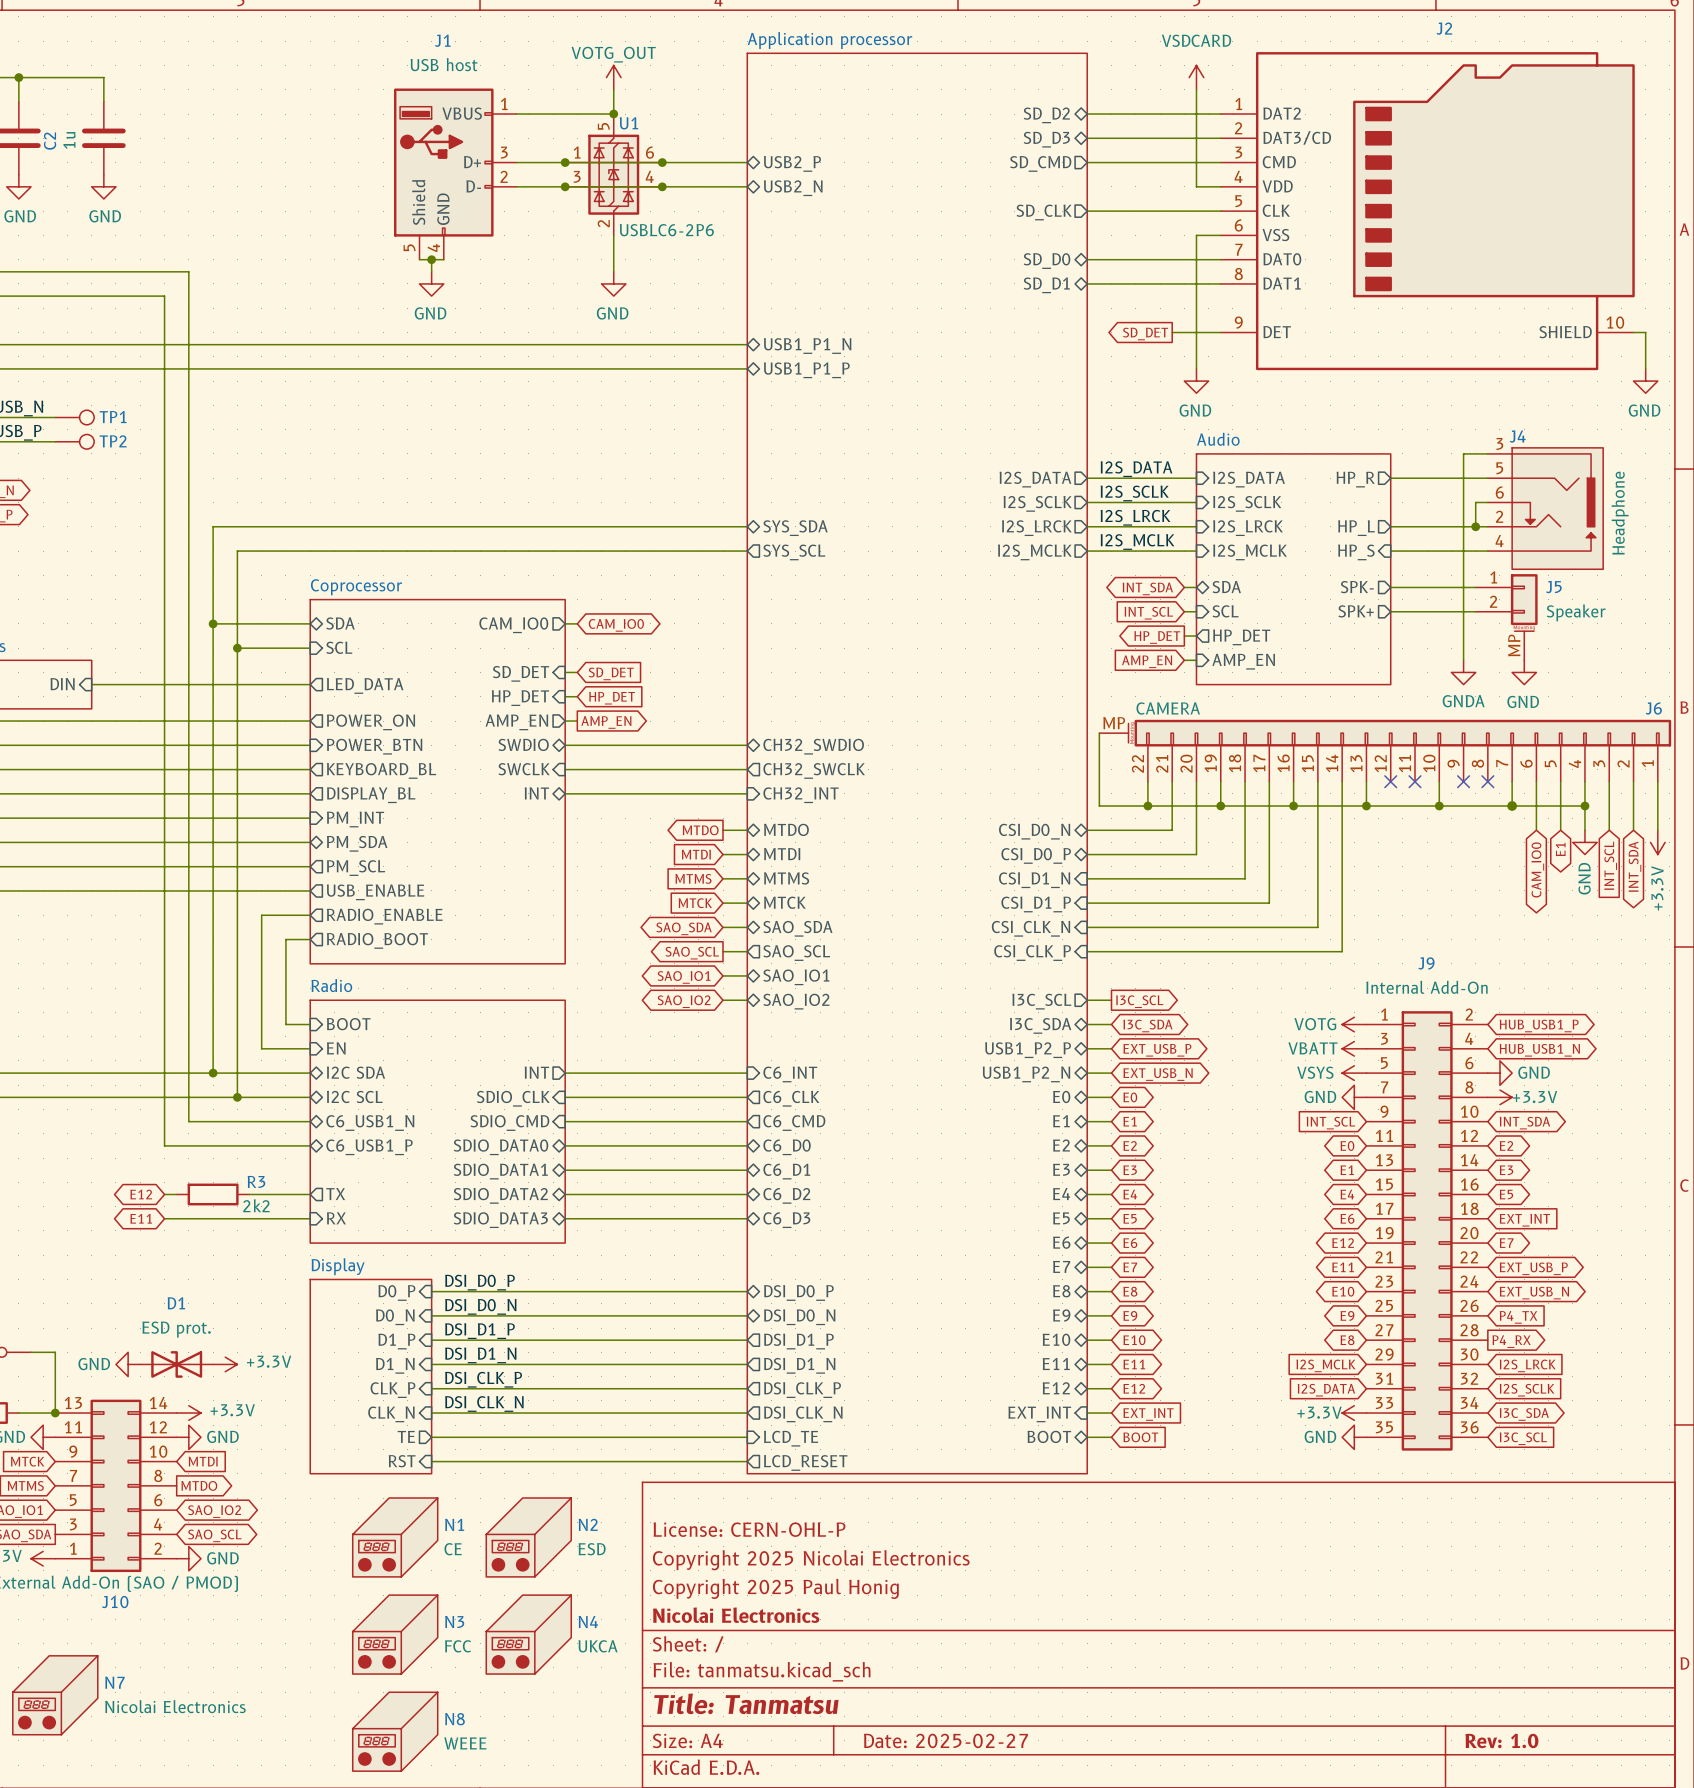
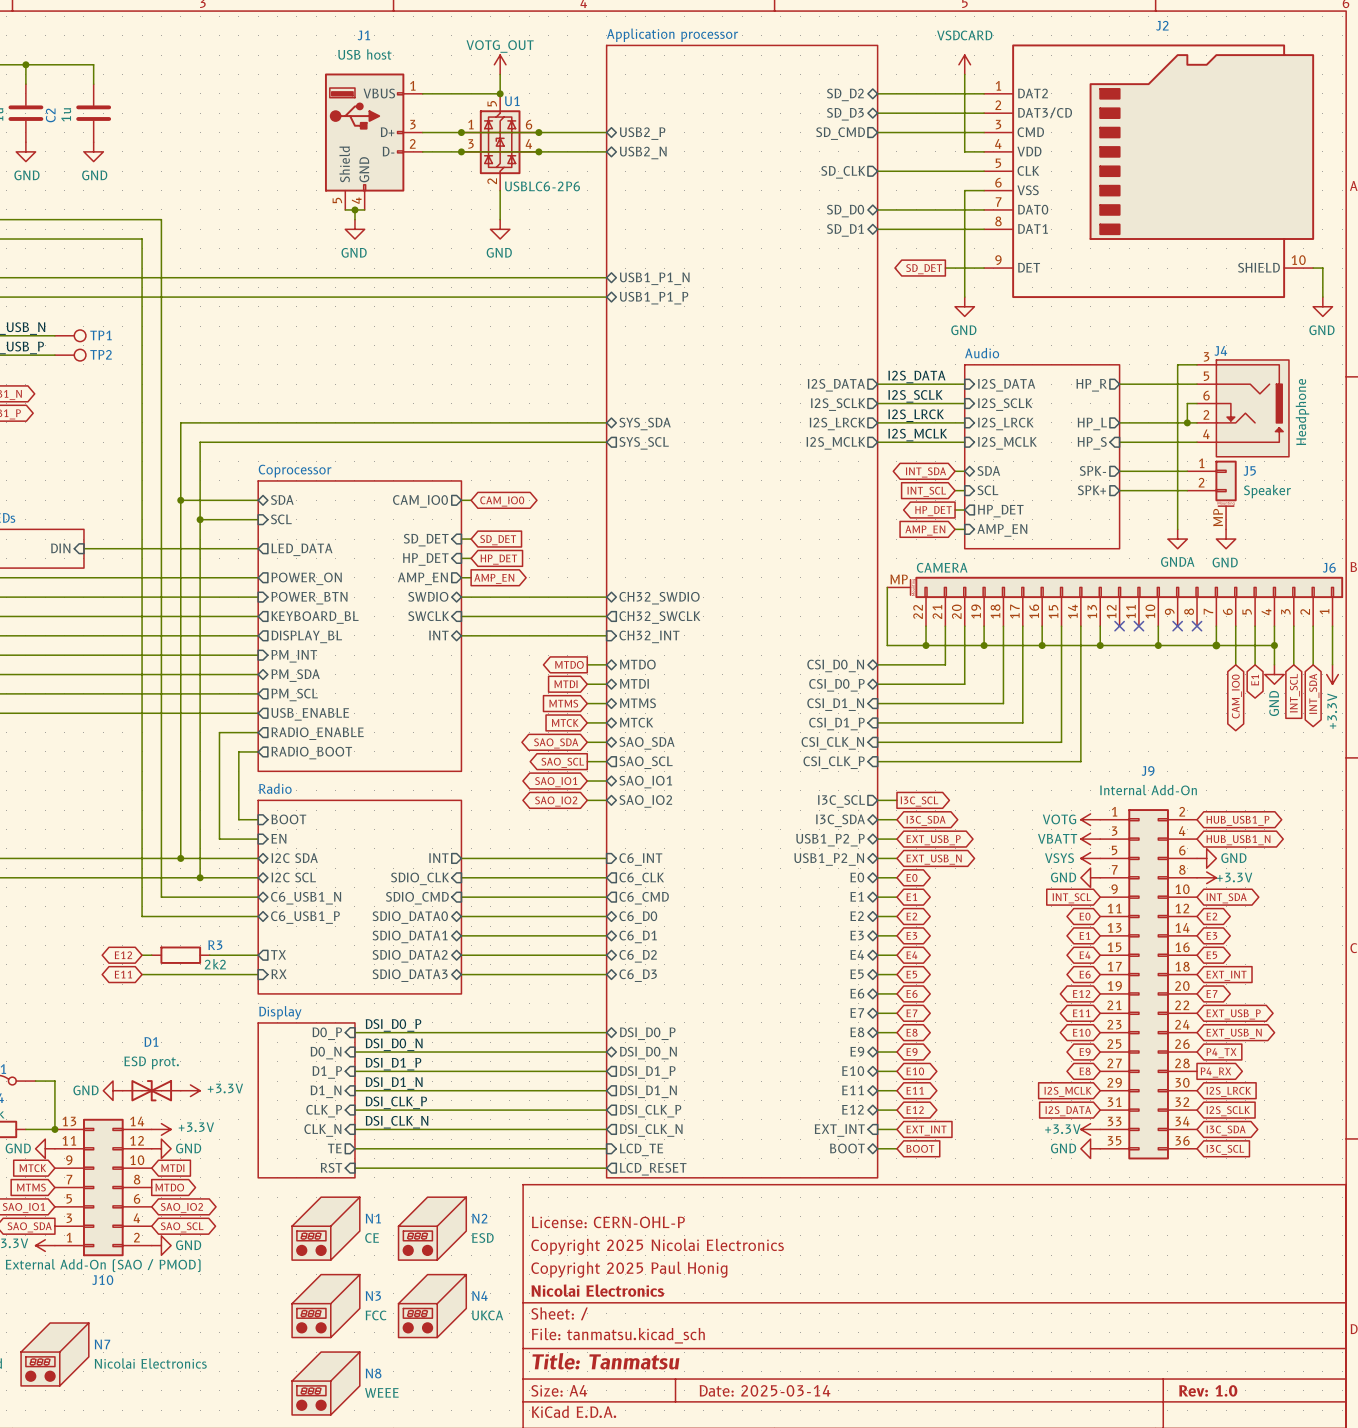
title block: Date: 2025-02-27 (945, 1740) -> Date: 2025-03-14 (765, 1390)

